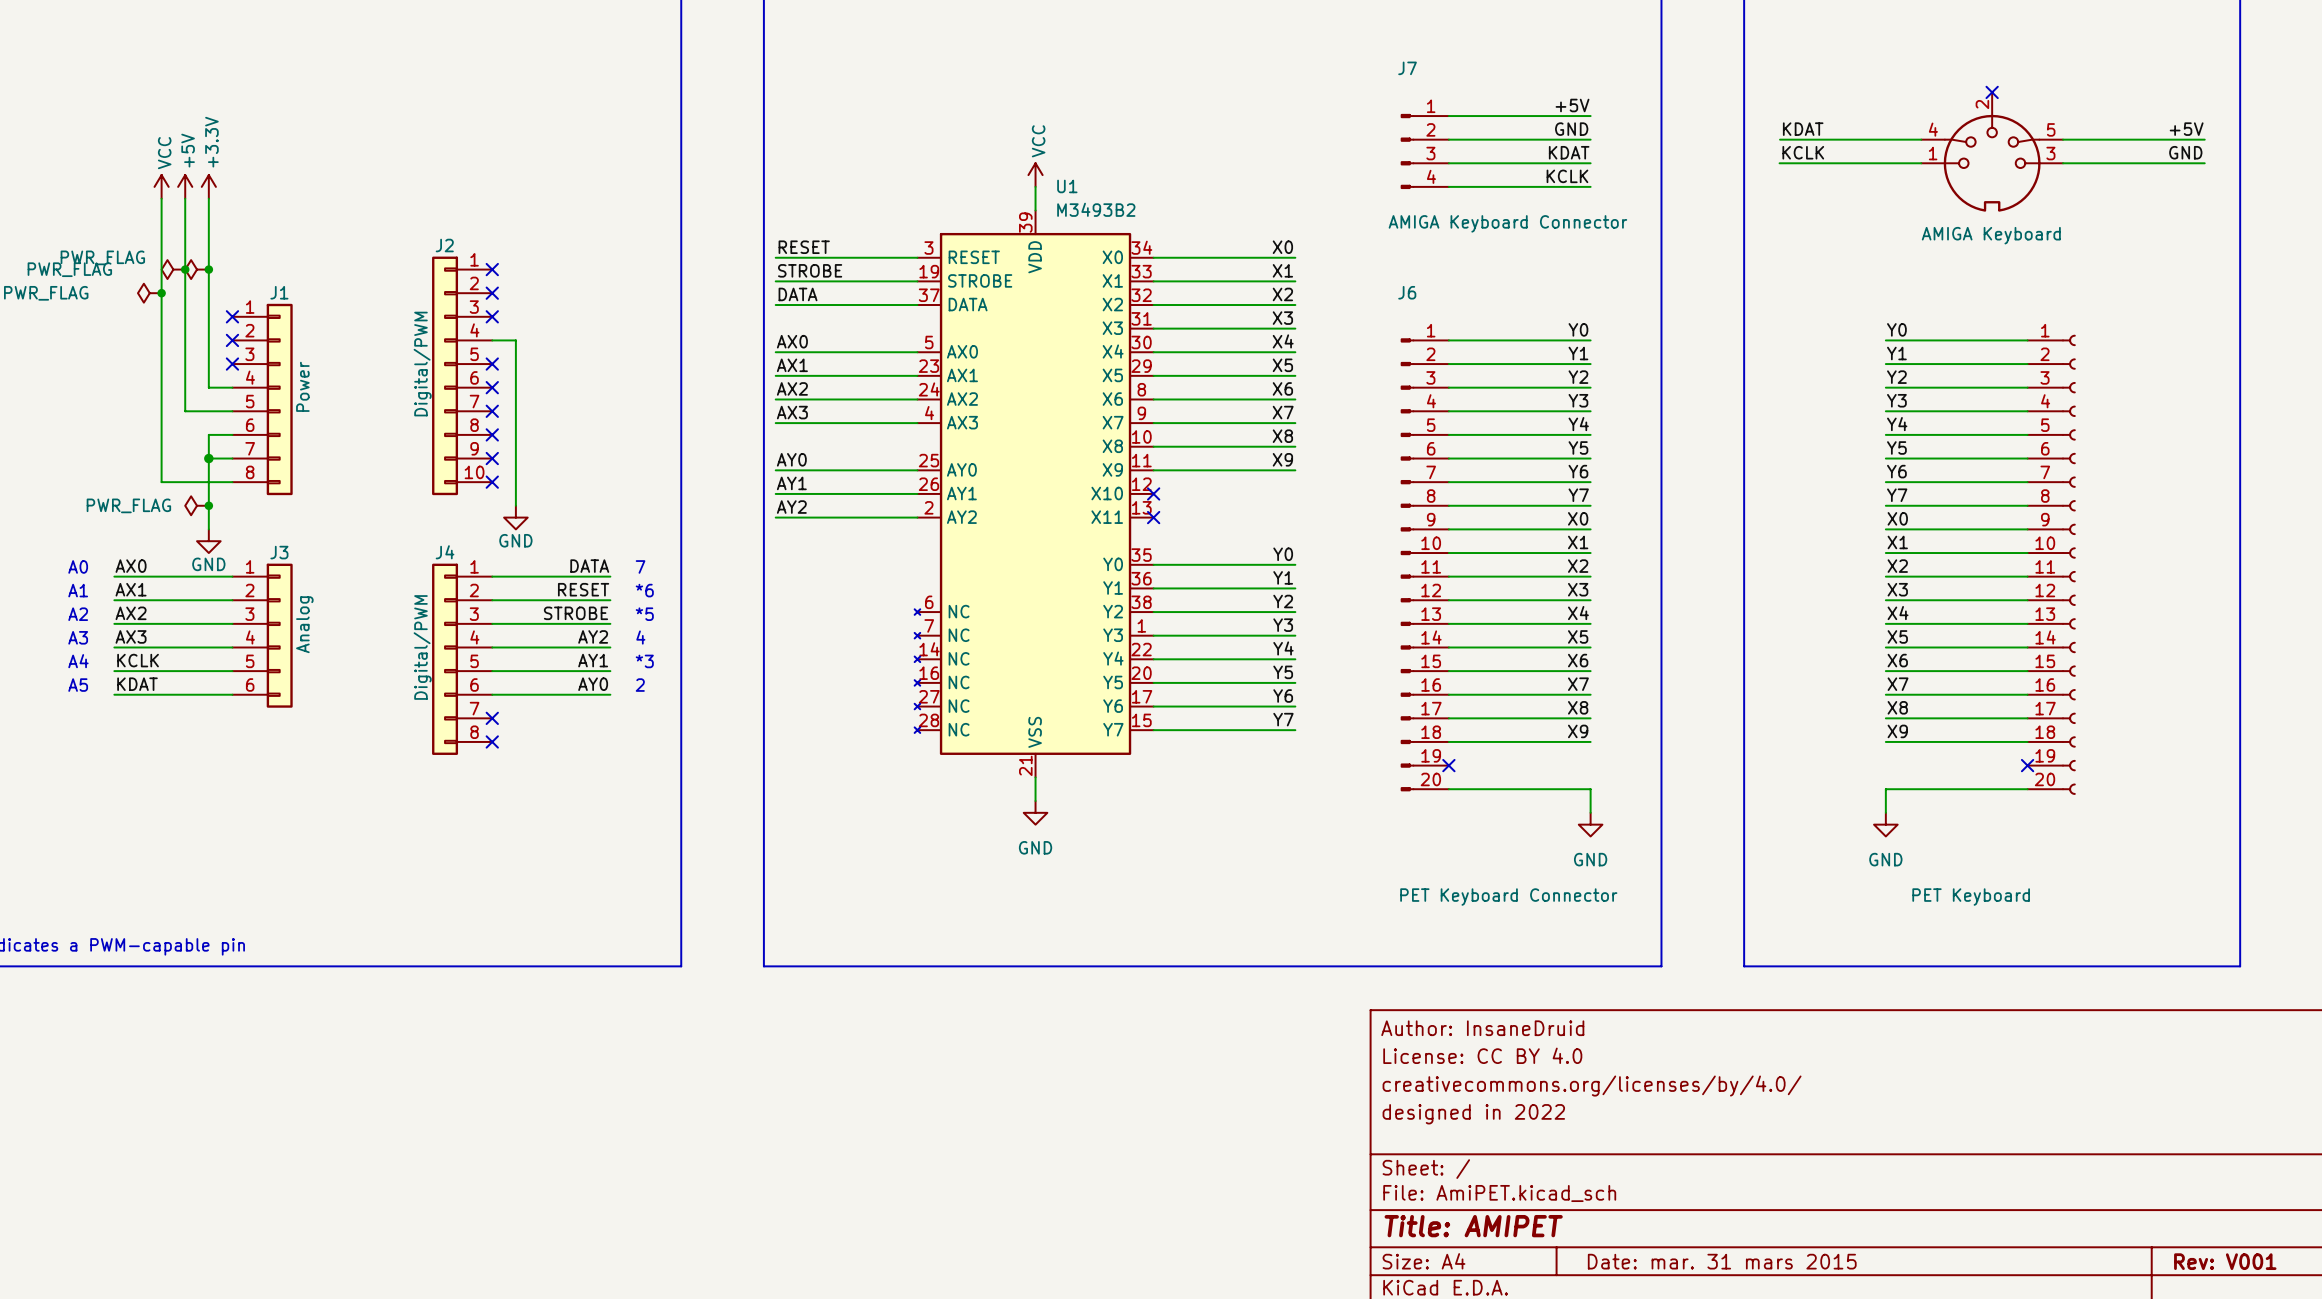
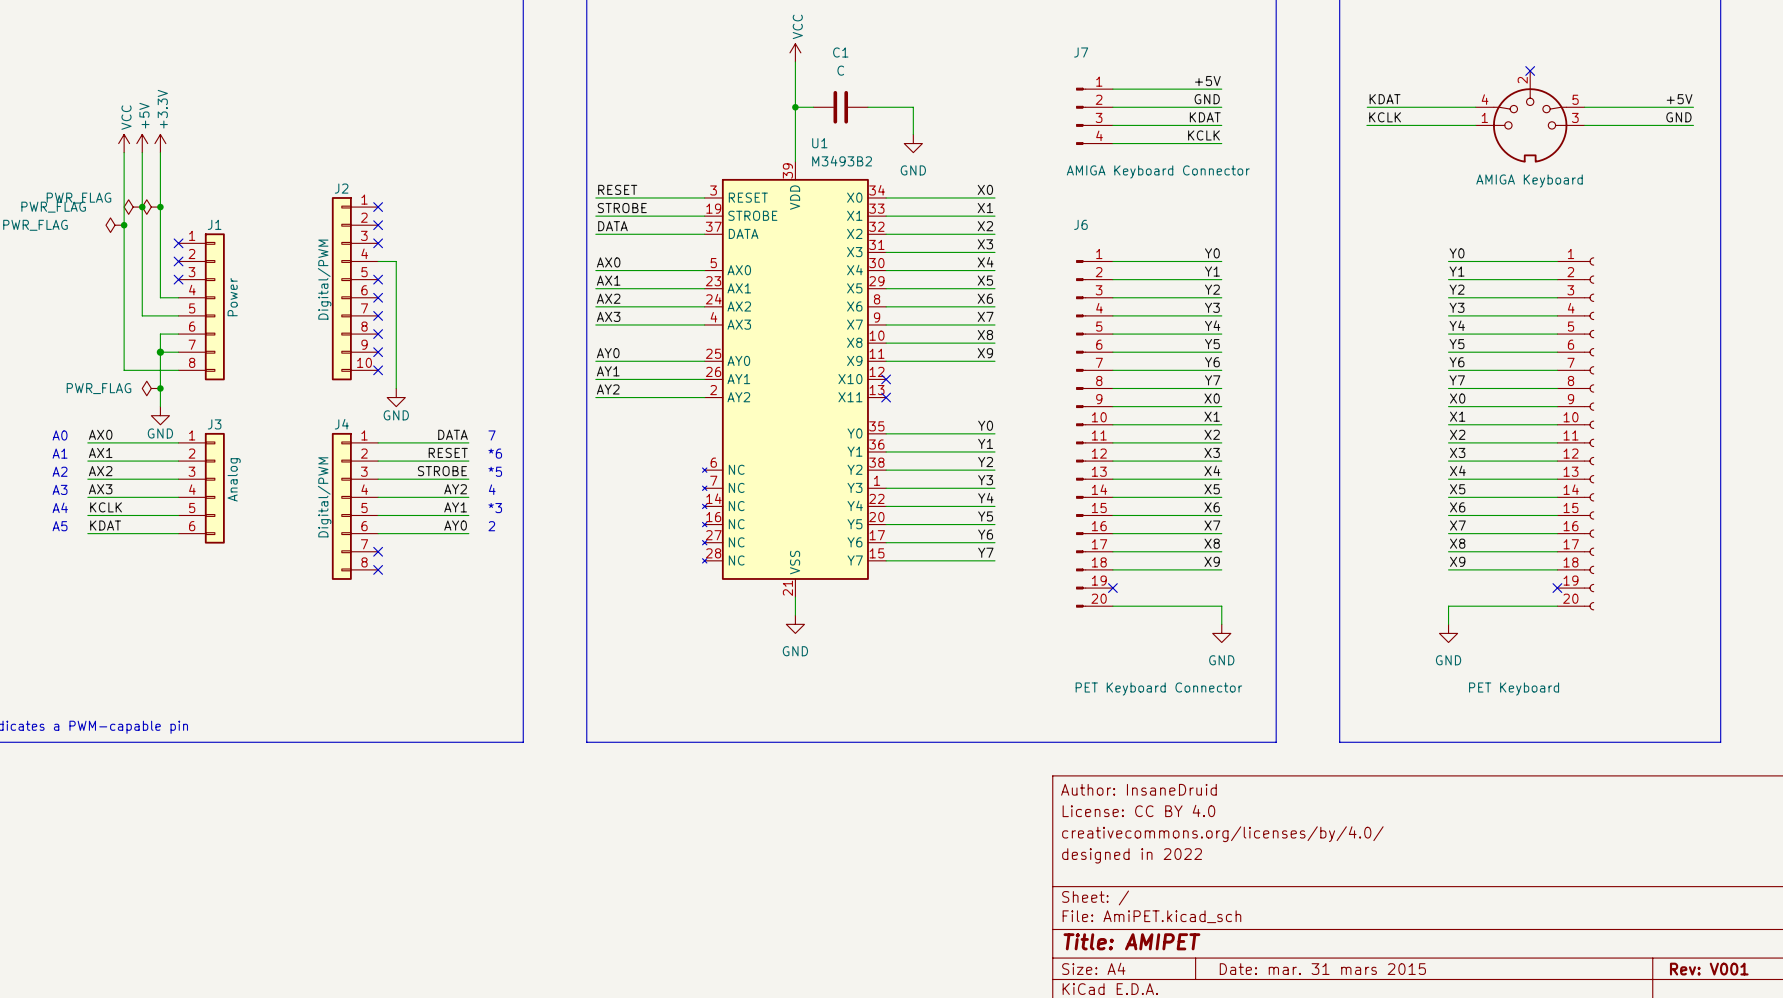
wire: none -> (795, 61) (795, 143)
wire: none -> (795, 107) (813, 107)
junction: none -> (795, 107)
C1: none -> C (840, 107)
wire: none -> (867, 107) (913, 107) (913, 134)
power symbol position: VCC (1035, 175) -> VCC (795, 52)
power symbol: none -> GND (913, 143)

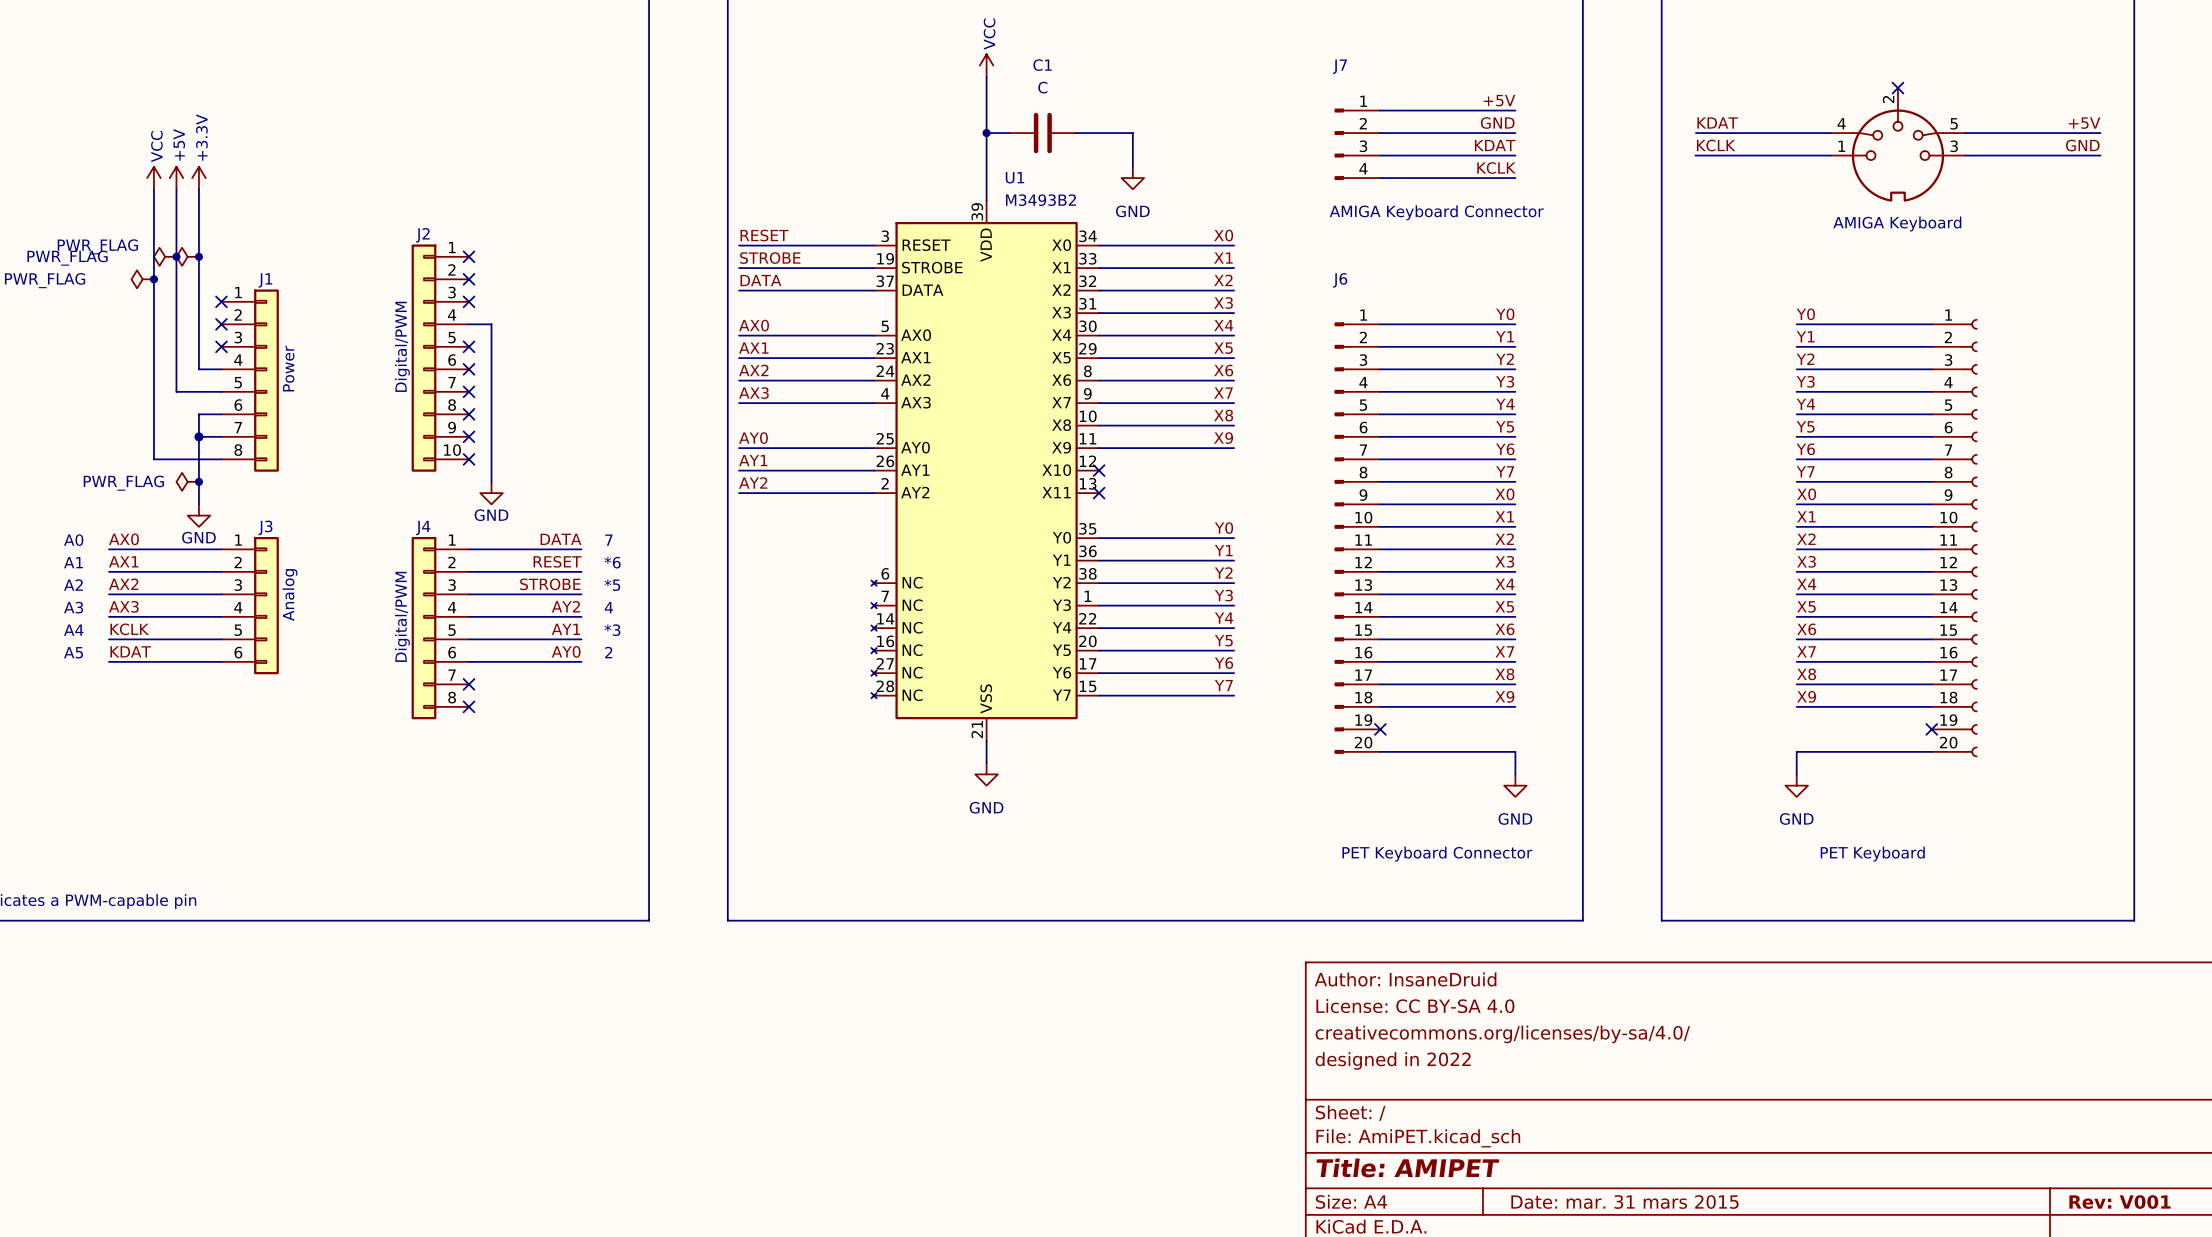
title block: License: CC BY 4.0 (1138, 810) -> License: CC BY-SA 4.0 (1415, 1006)
title block: creativecommons.org/licenses/by/4.0/ (1222, 834) -> creativecommons.org/licenses/by-sa/4.0/ (1502, 1034)

